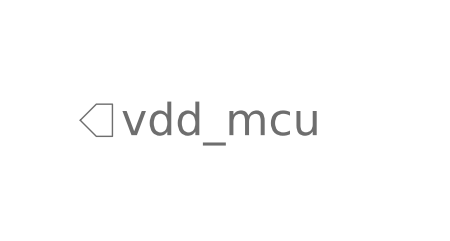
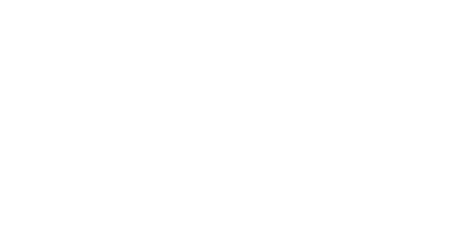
hierarchical label: vdd_mcu (219, 123) -> none

